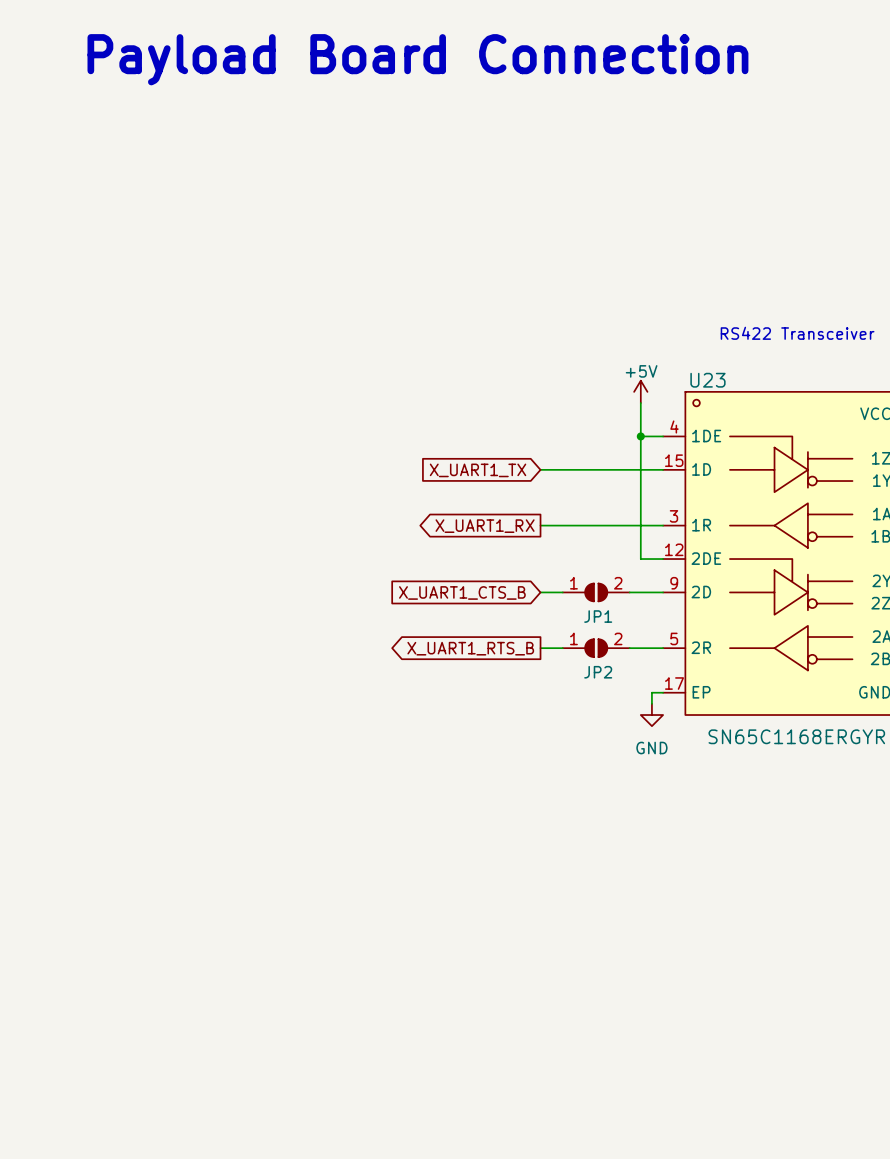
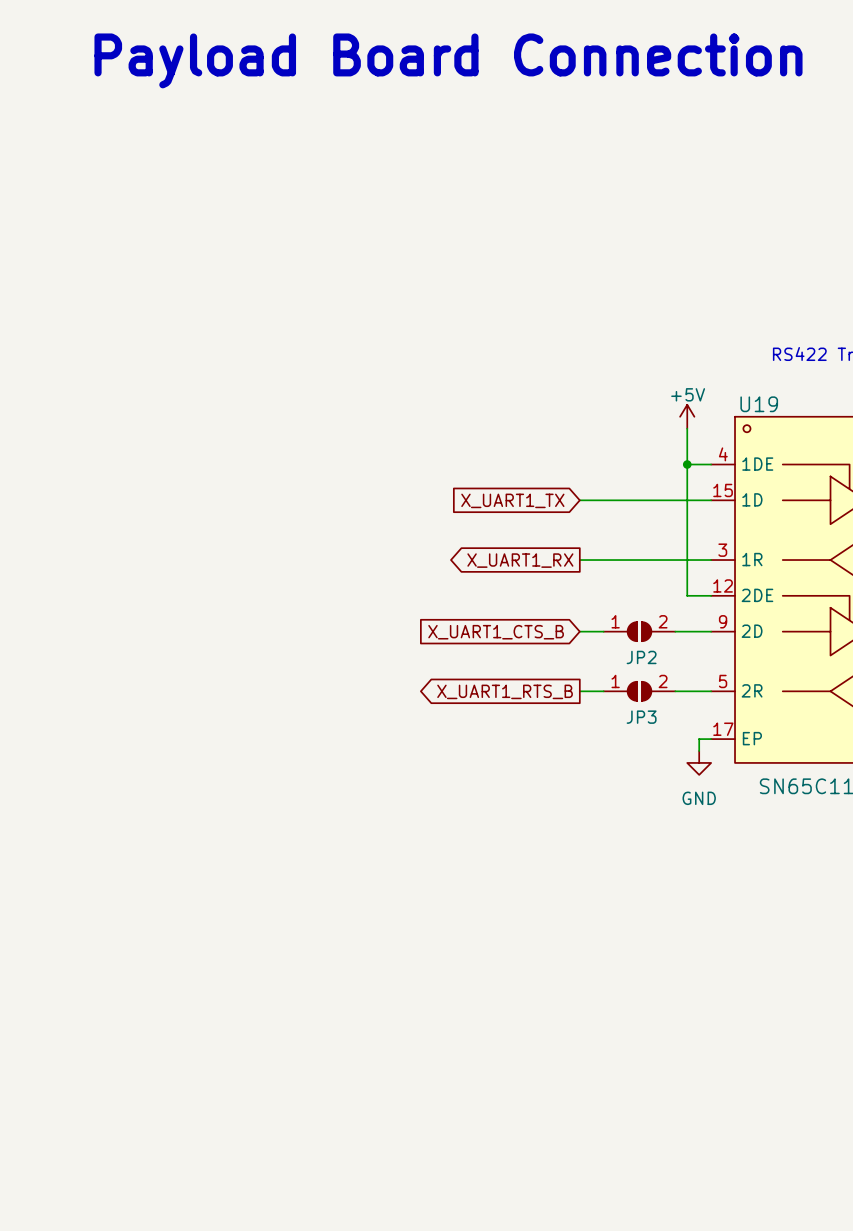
U23 name: U23 (707, 380) -> U19 (759, 404)
JP1 name: JP1 (598, 616) -> JP2 (641, 657)
JP2 name: JP2 (598, 672) -> JP3 (641, 717)

